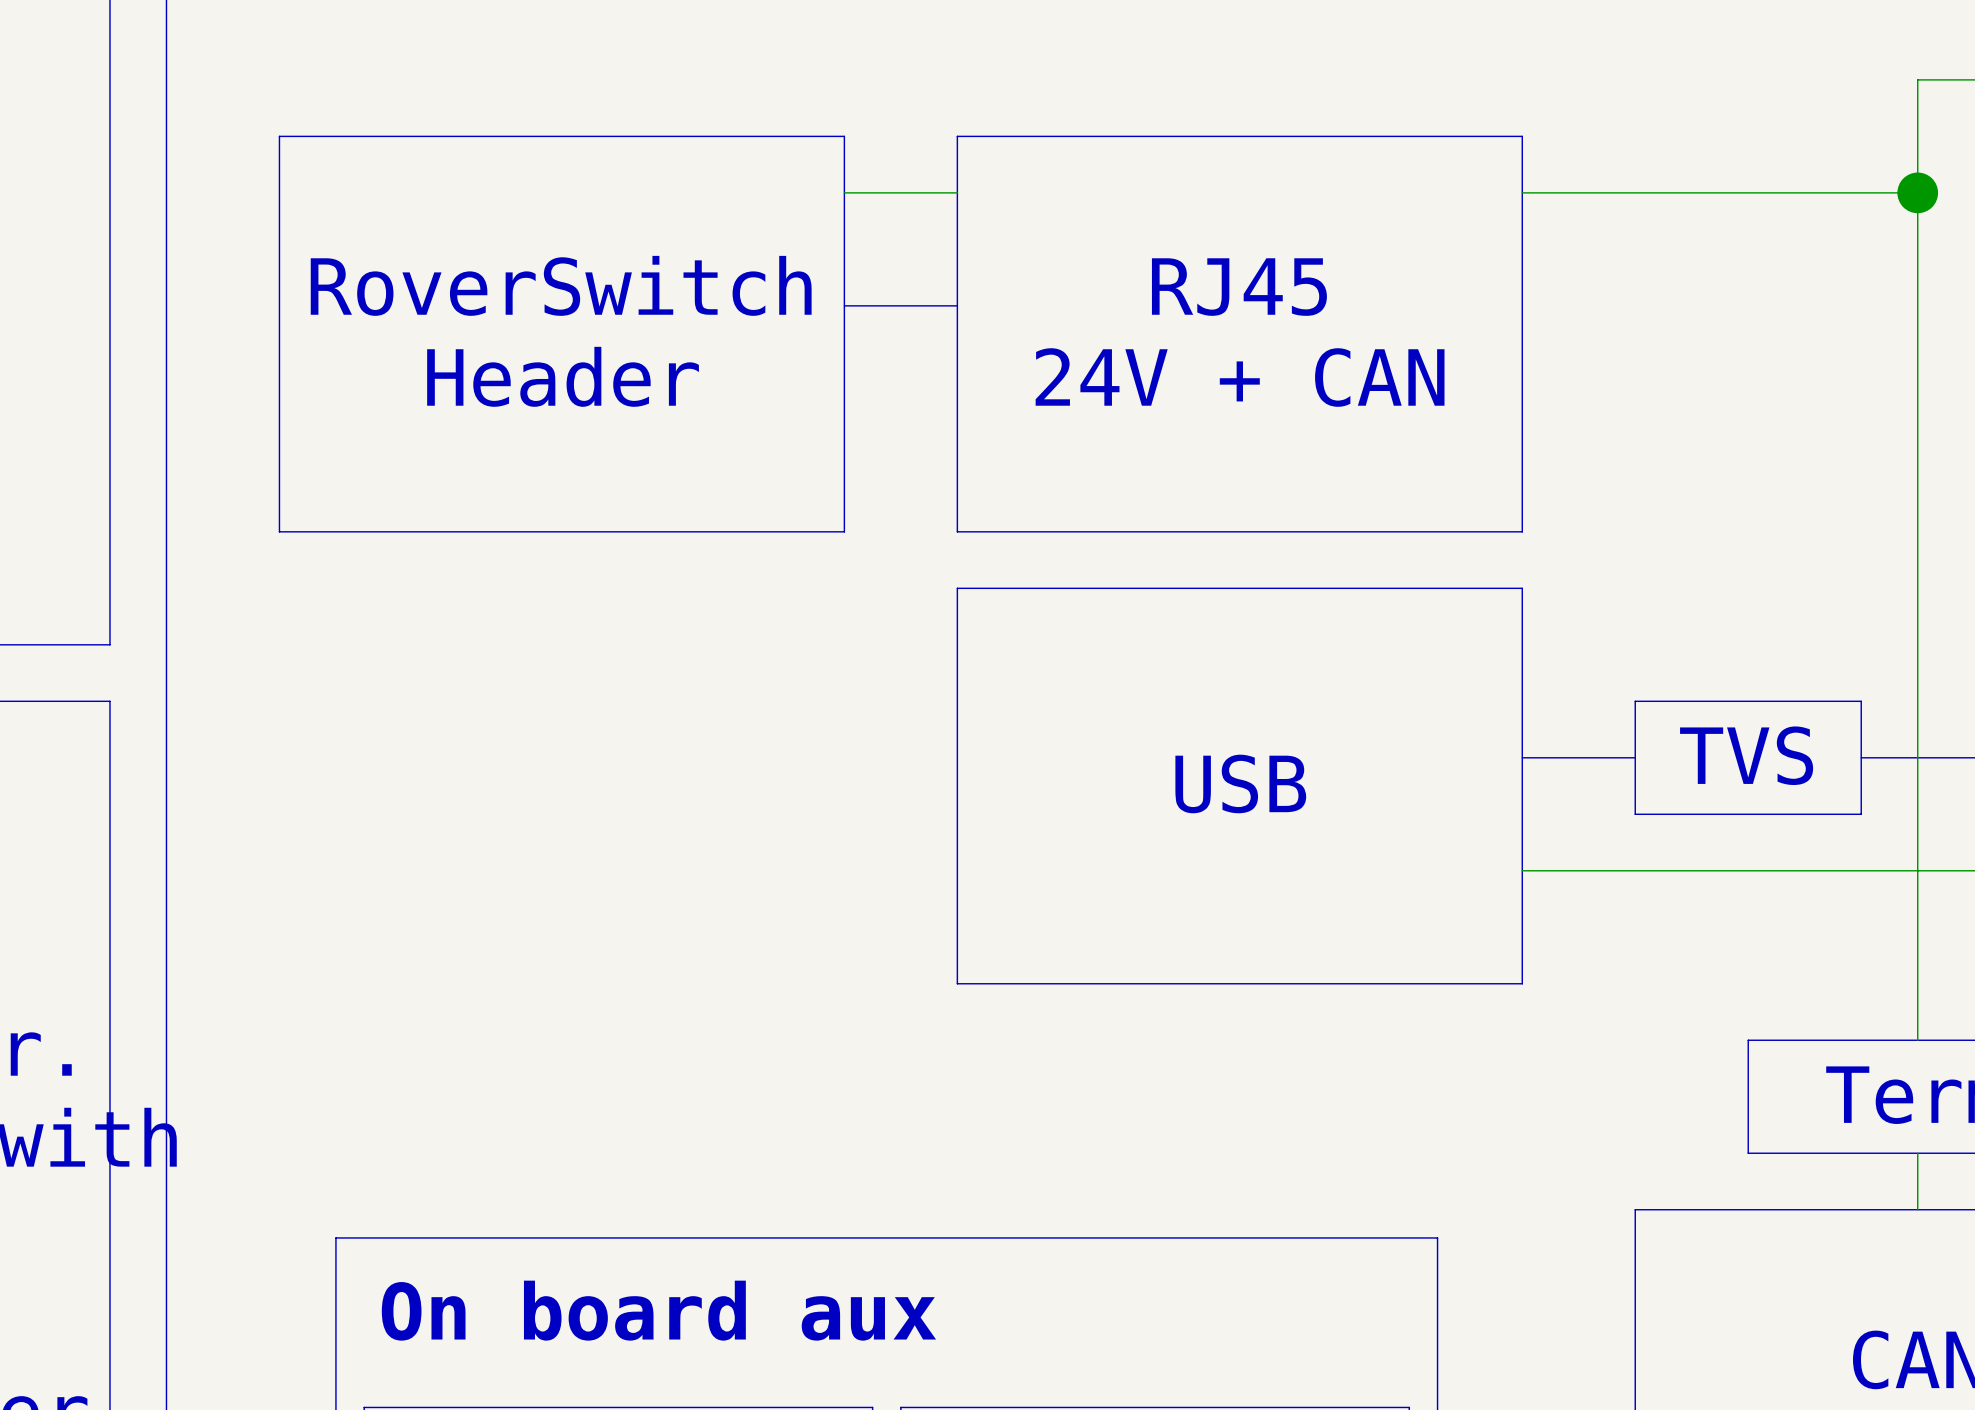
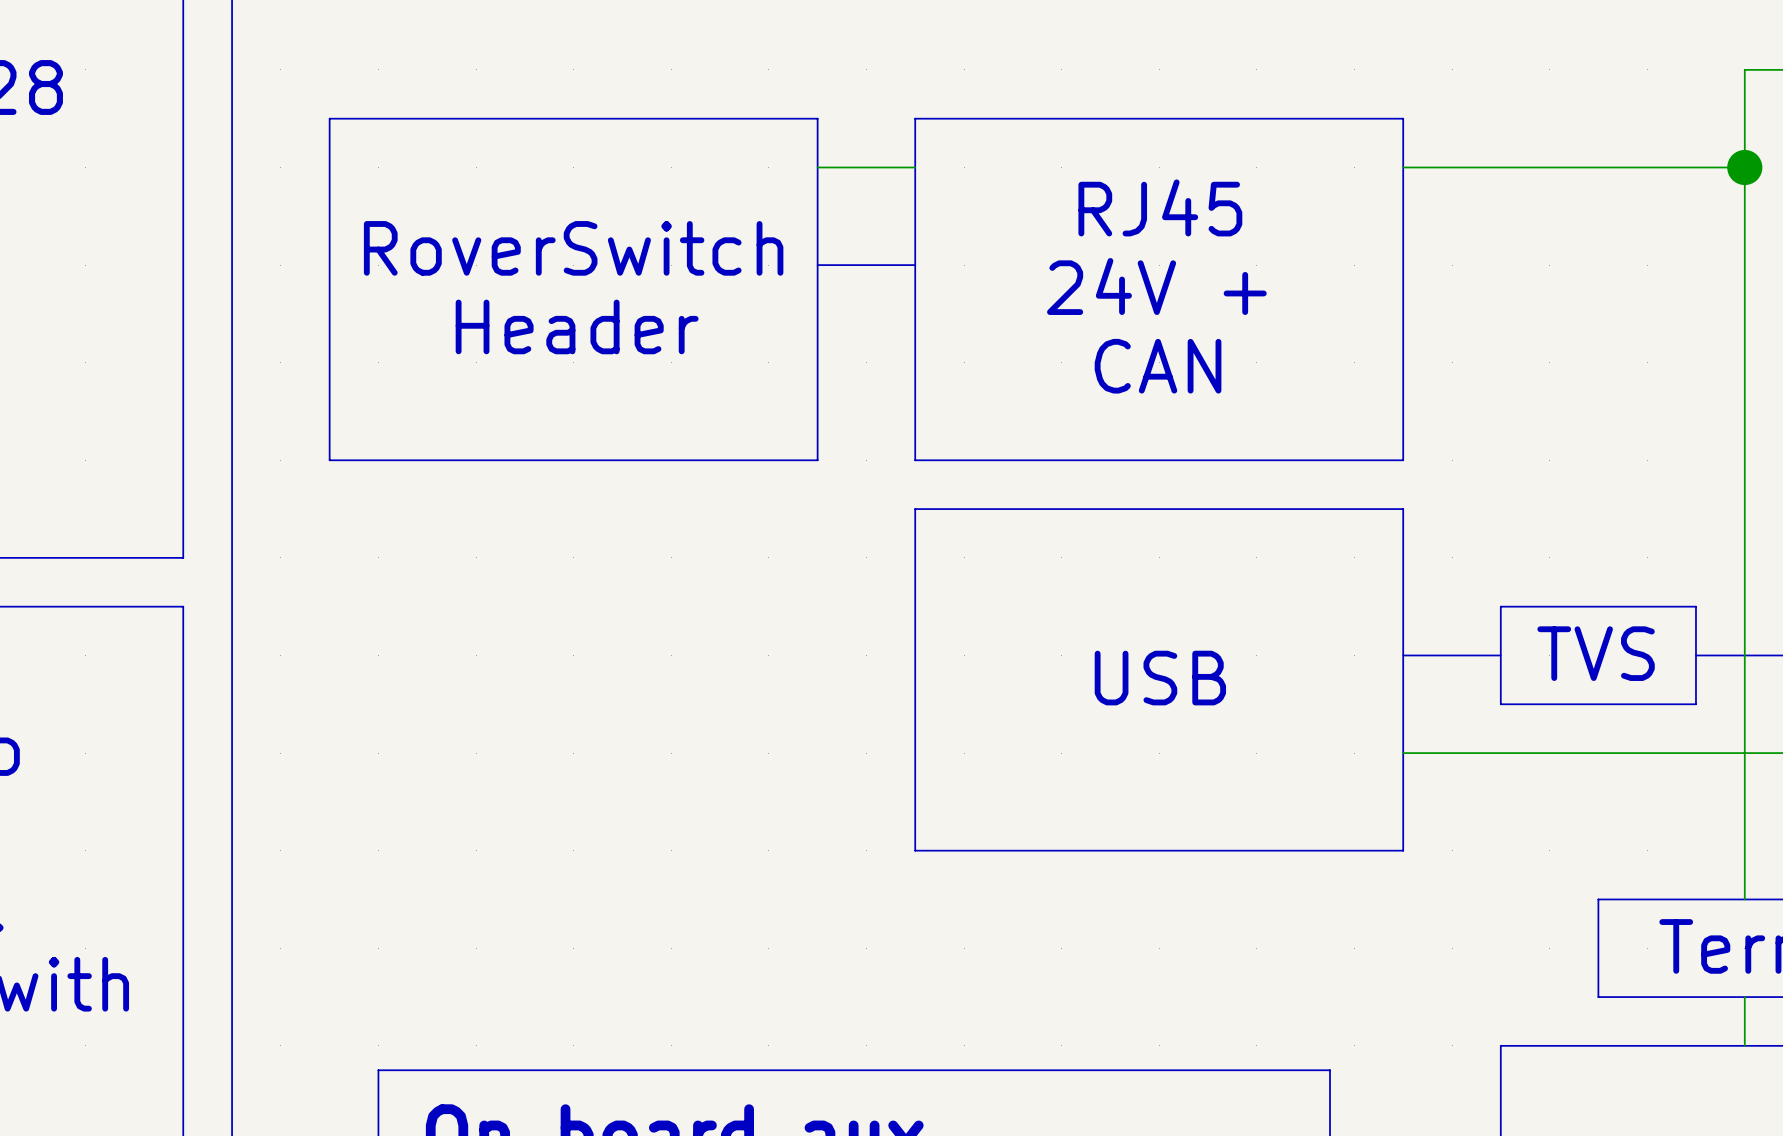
text position: RJ45 (1239, 287) -> RJ45 (1160, 207)
text: 24V + CAN (1240, 377) -> 24V + (1156, 286)
text: none -> CAN (1158, 366)

